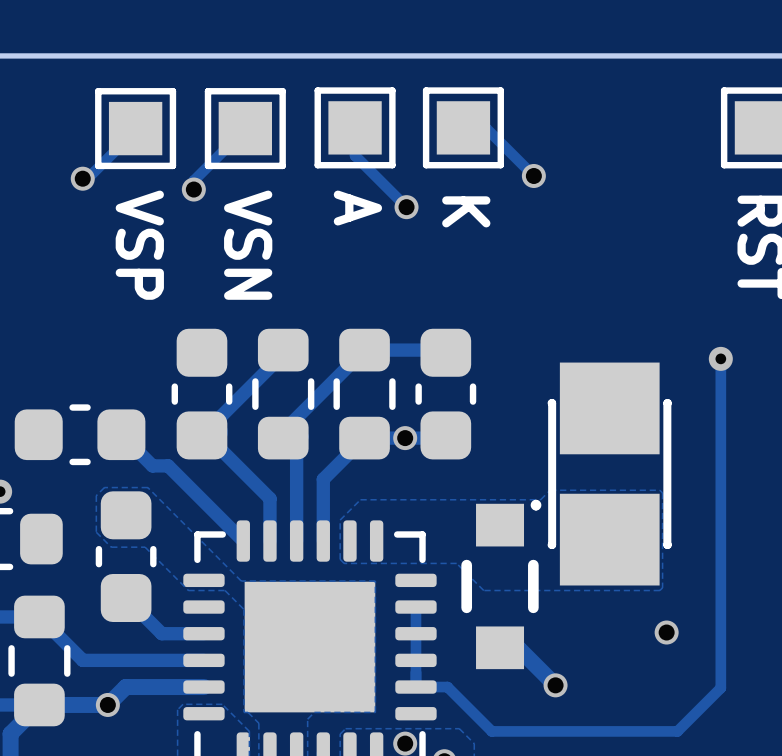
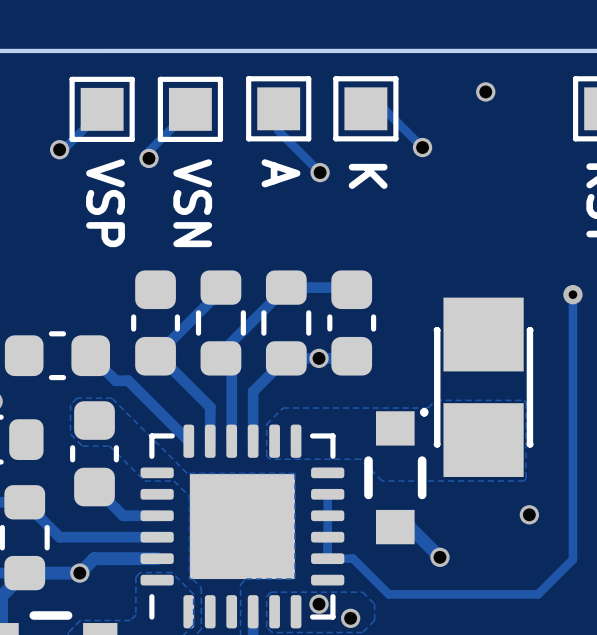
via: none -> (485, 91)

